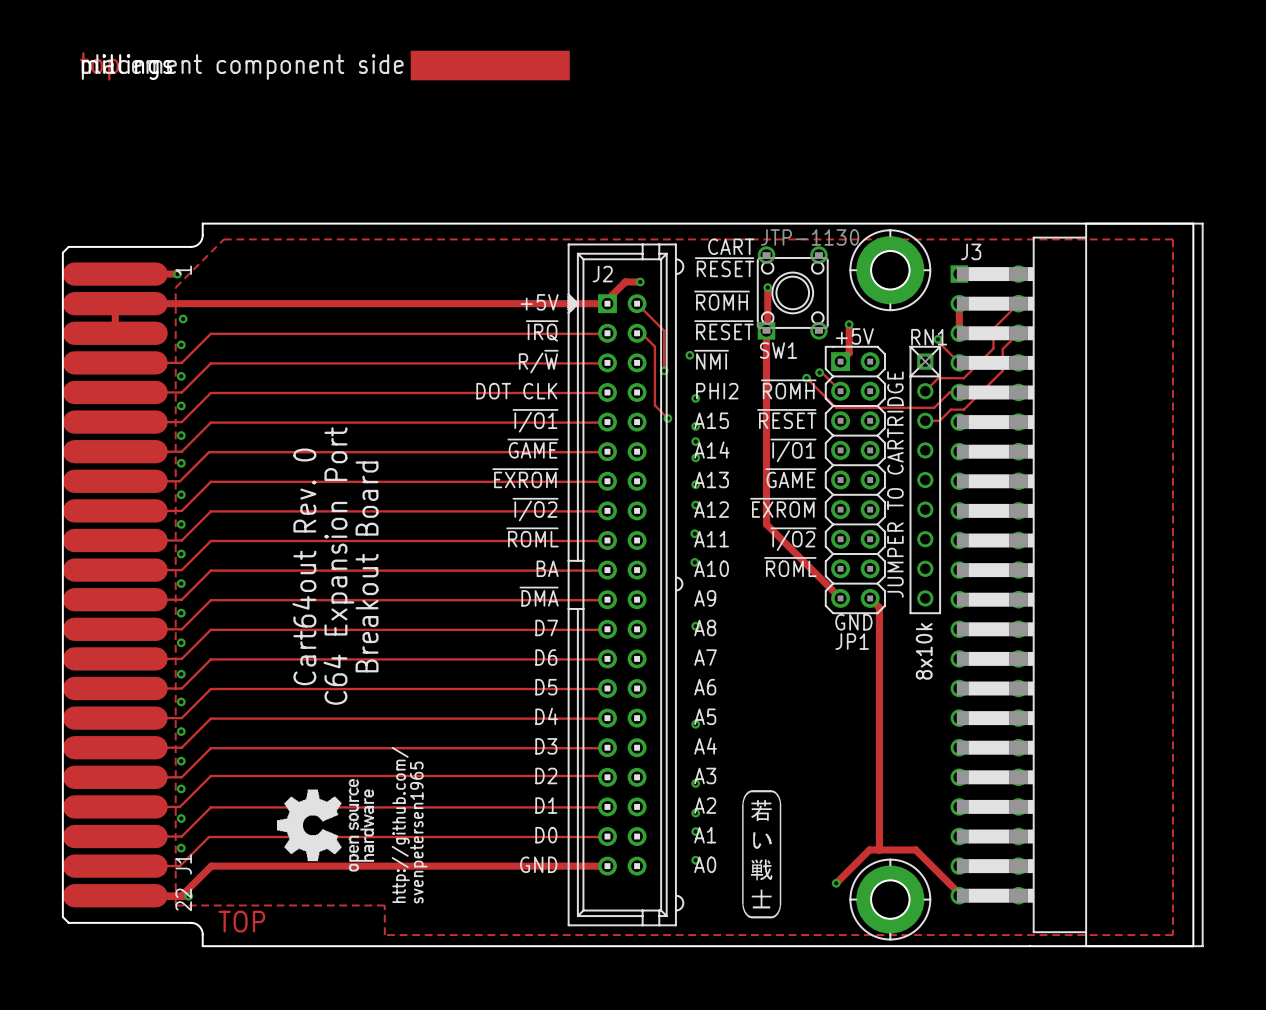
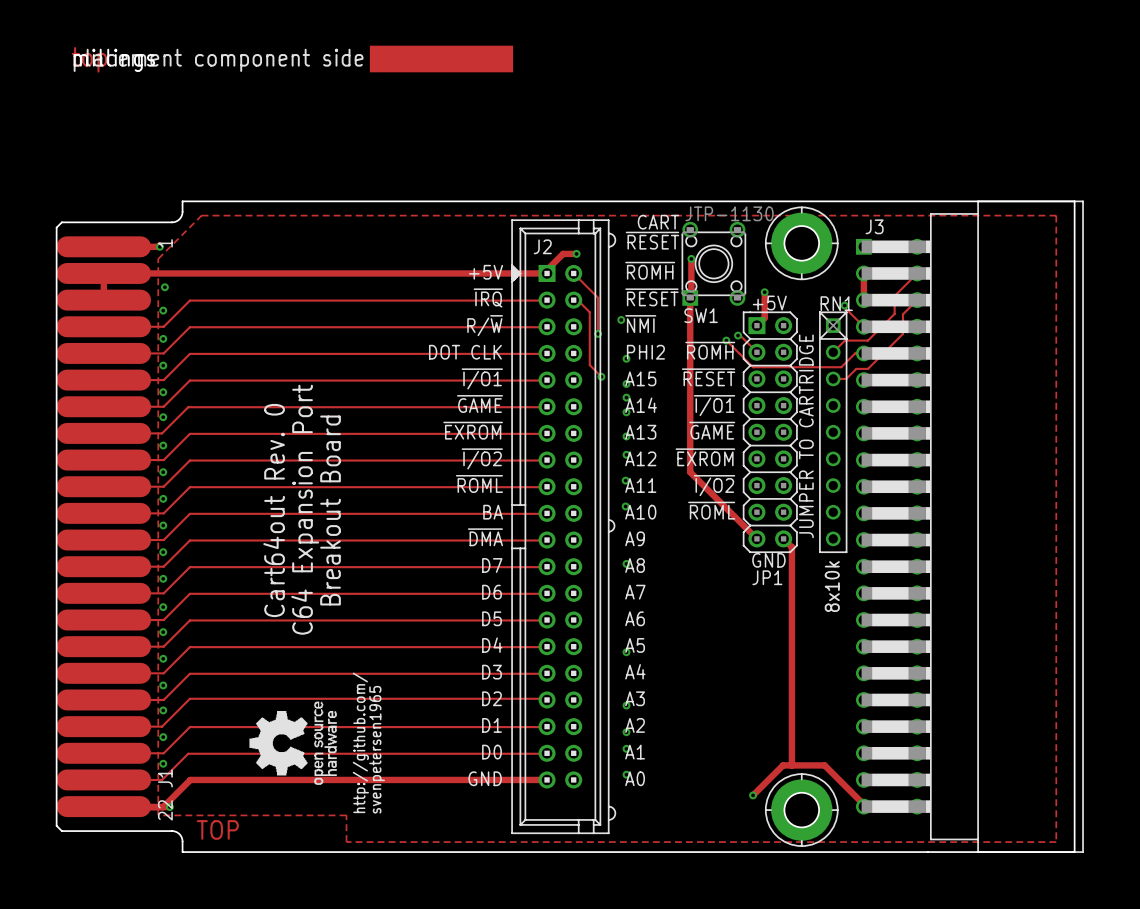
drawing: [742, 790, 782, 919] -> none

